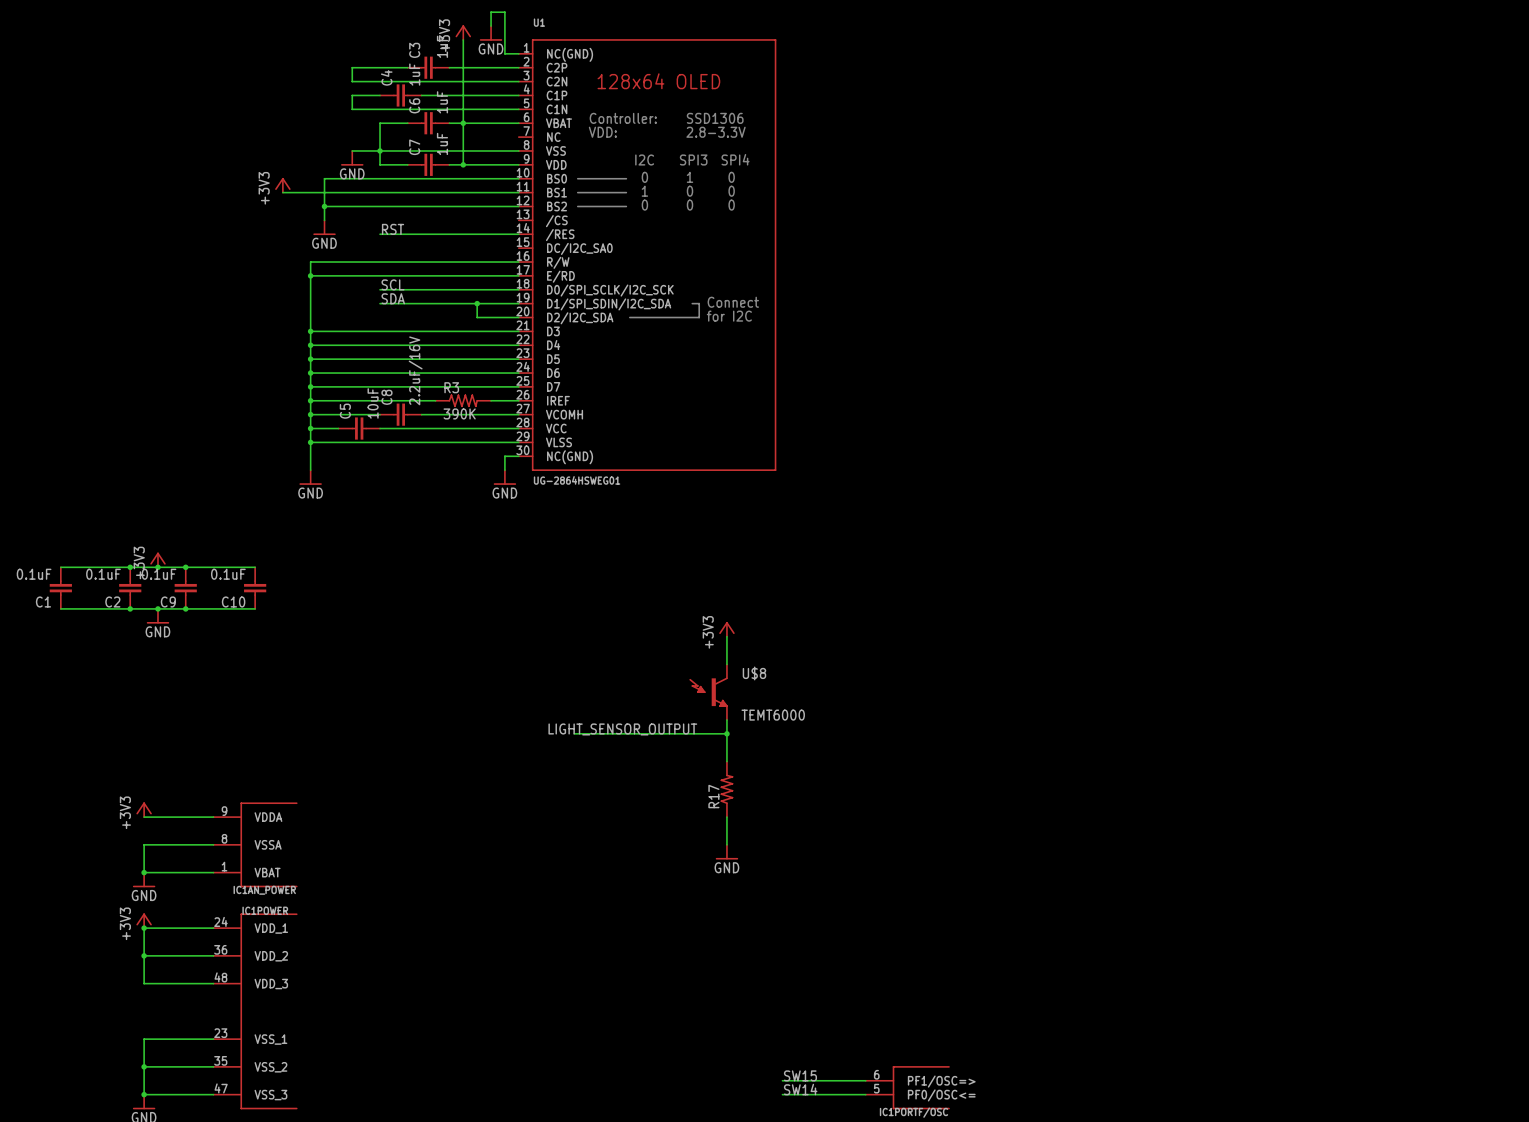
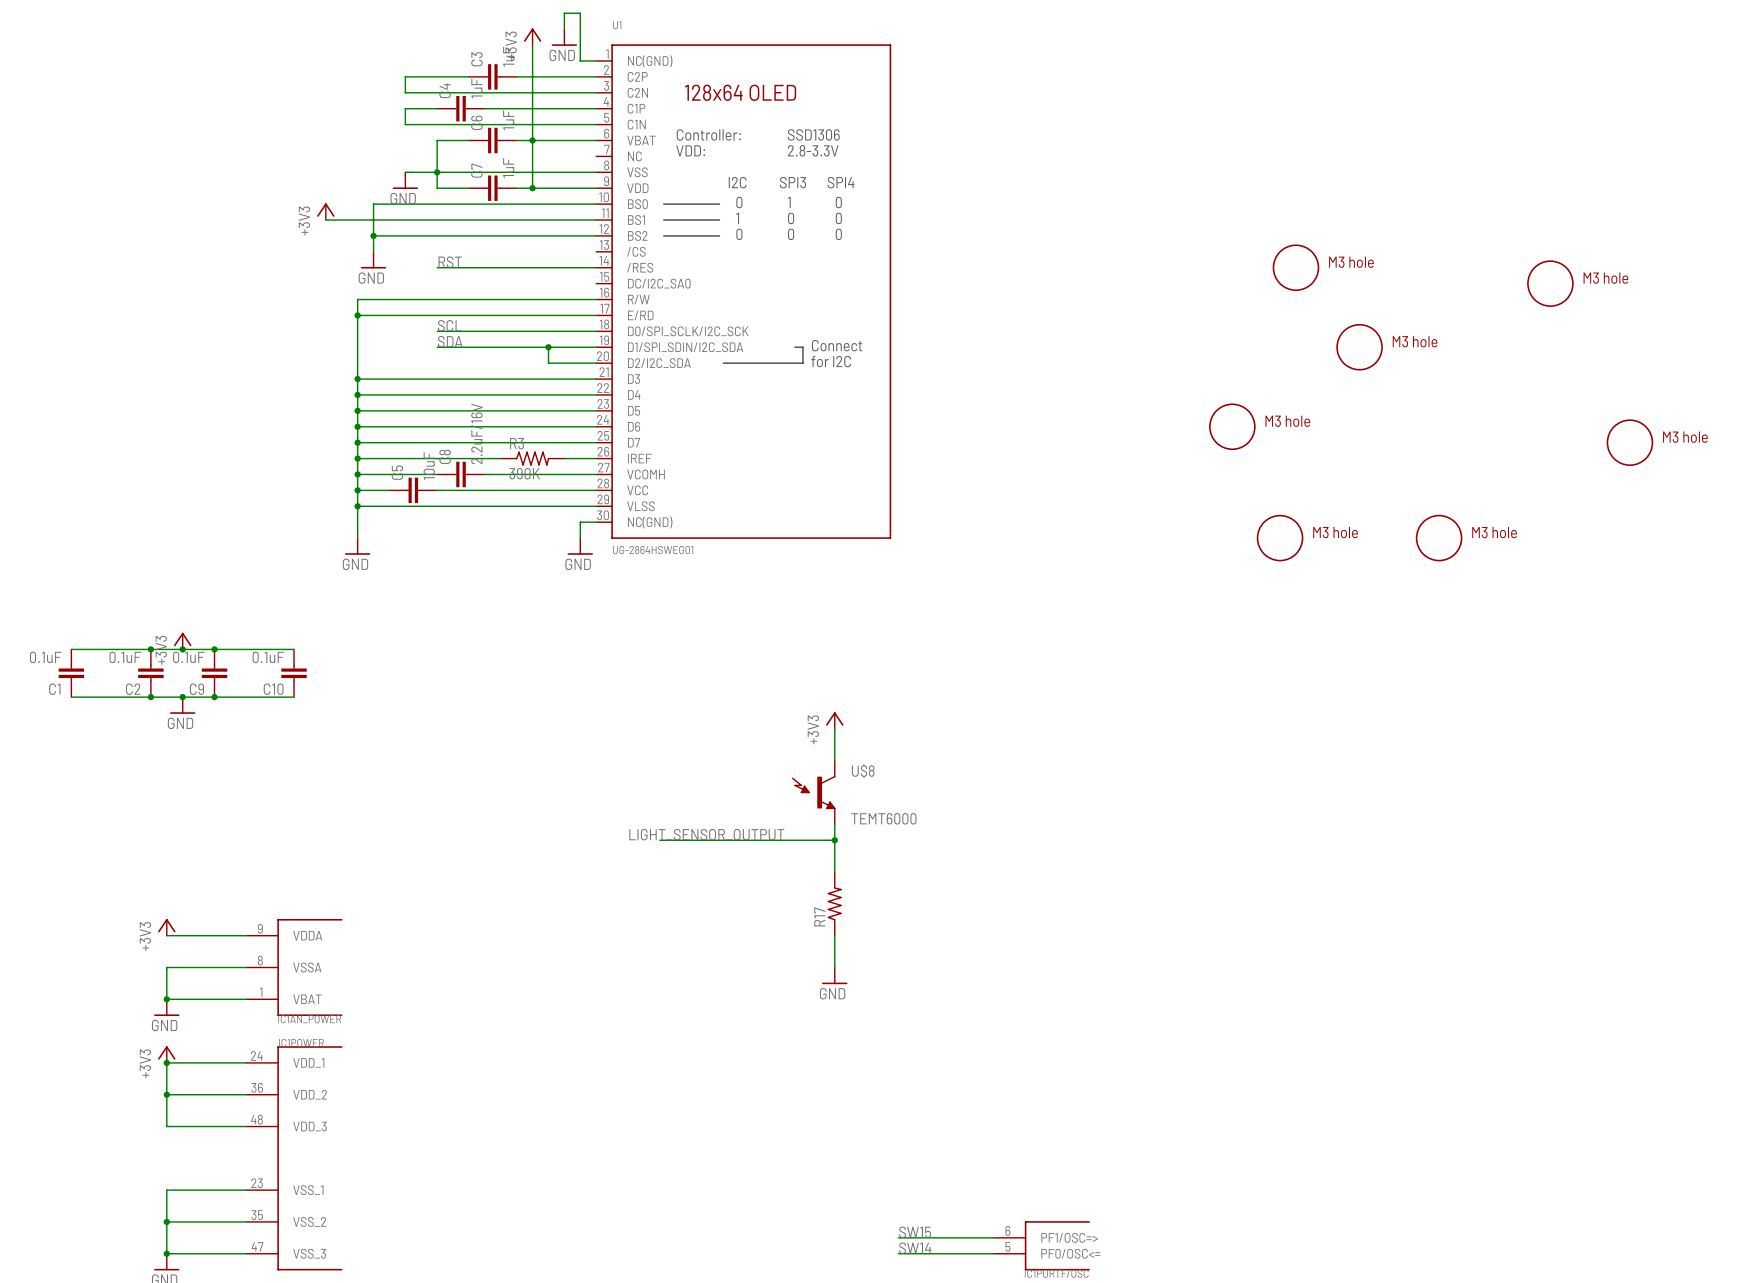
part: none -> (1295, 267)
part: none -> (1550, 283)
part: none -> (1359, 347)
part: none -> (1232, 426)
part: none -> (1629, 442)
part: none -> (1280, 538)
part: none -> (1439, 538)

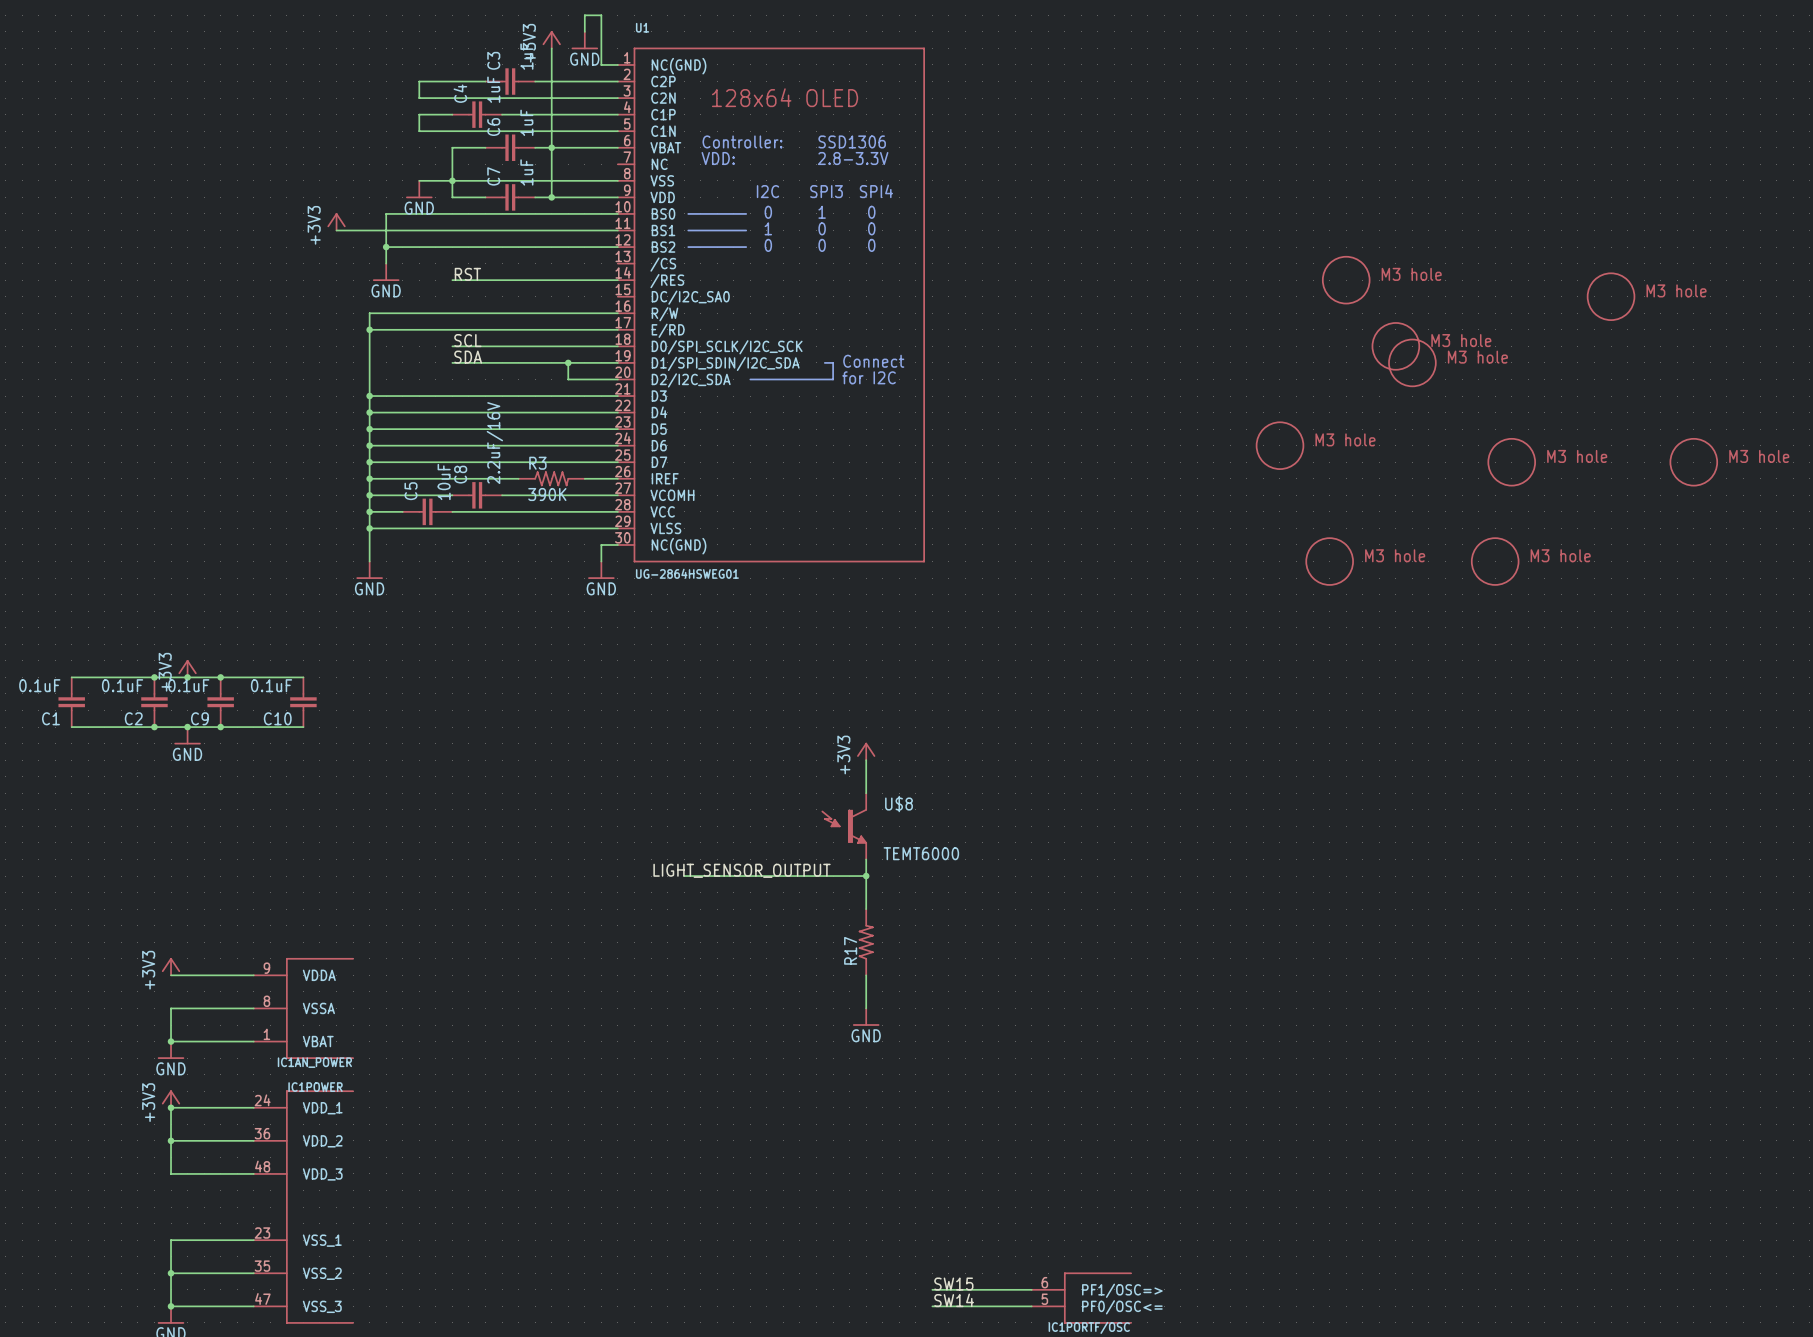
part: none -> (1395, 346)
part: none -> (1511, 462)

